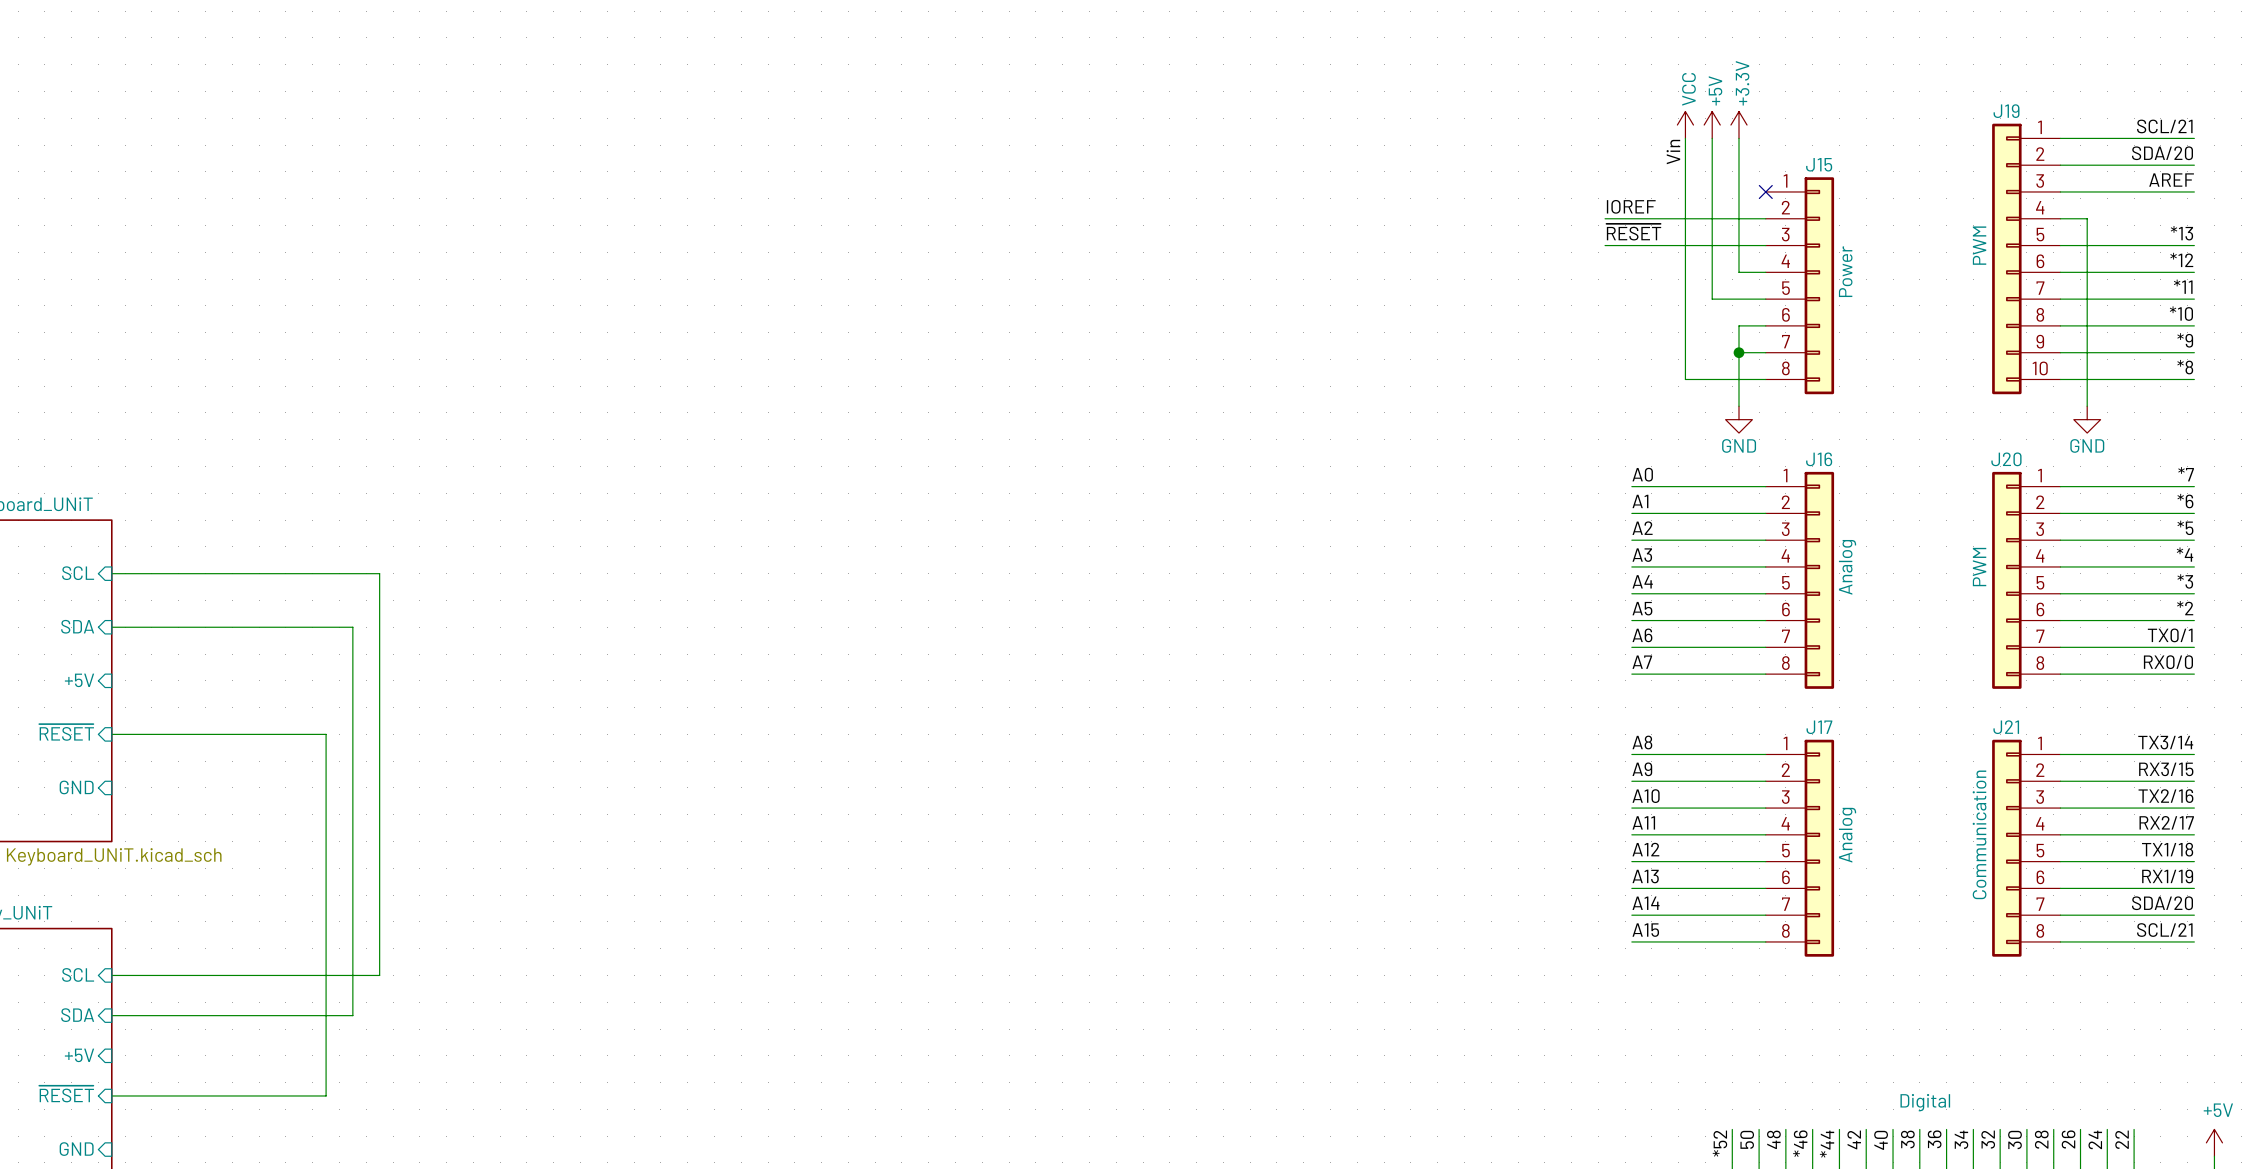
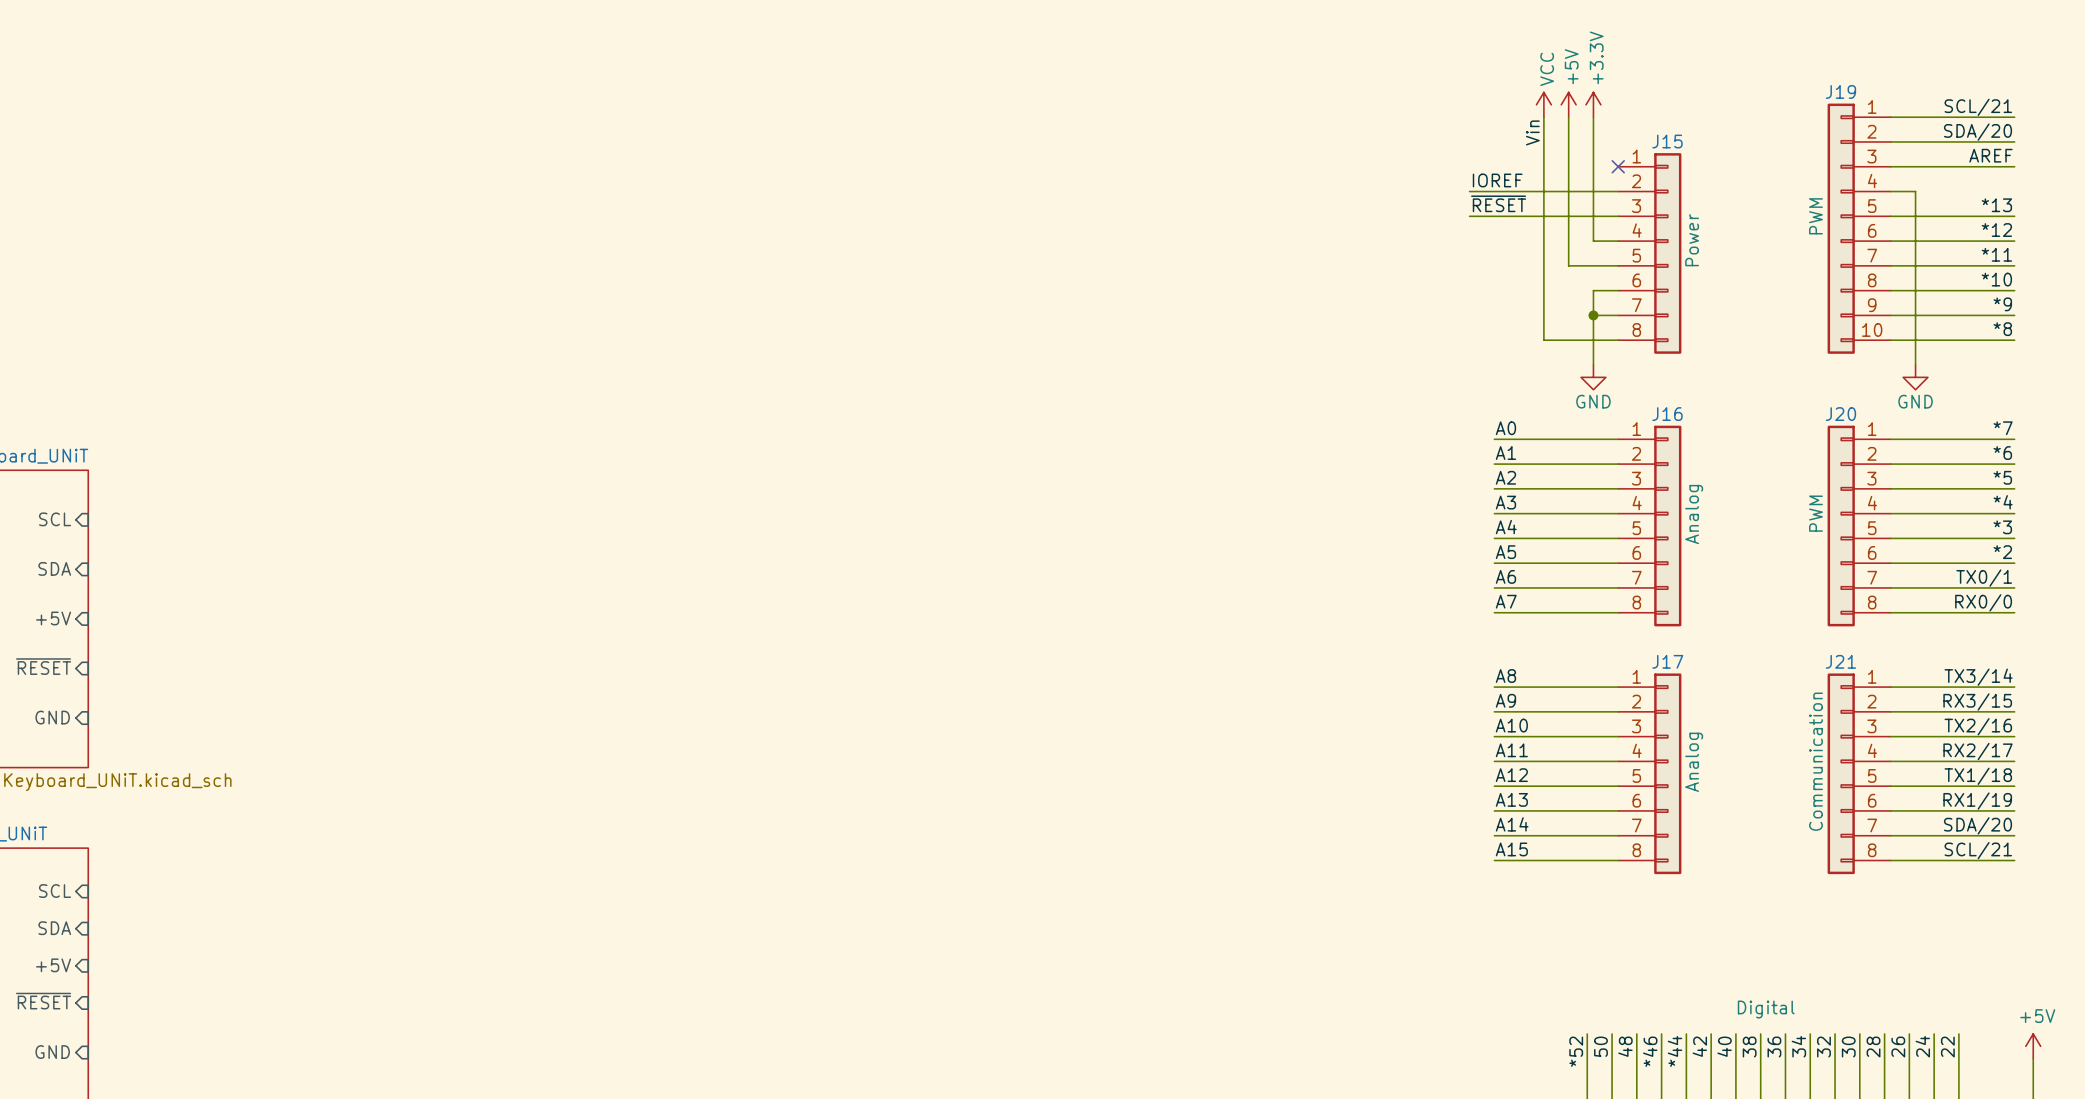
wire: (111, 573) (379, 573) (379, 975) (111, 975) -> none
wire: (111, 627) (352, 627) (352, 1015) (111, 1015) -> none
wire: (111, 734) (326, 734) (326, 1095) (111, 1095) -> none

